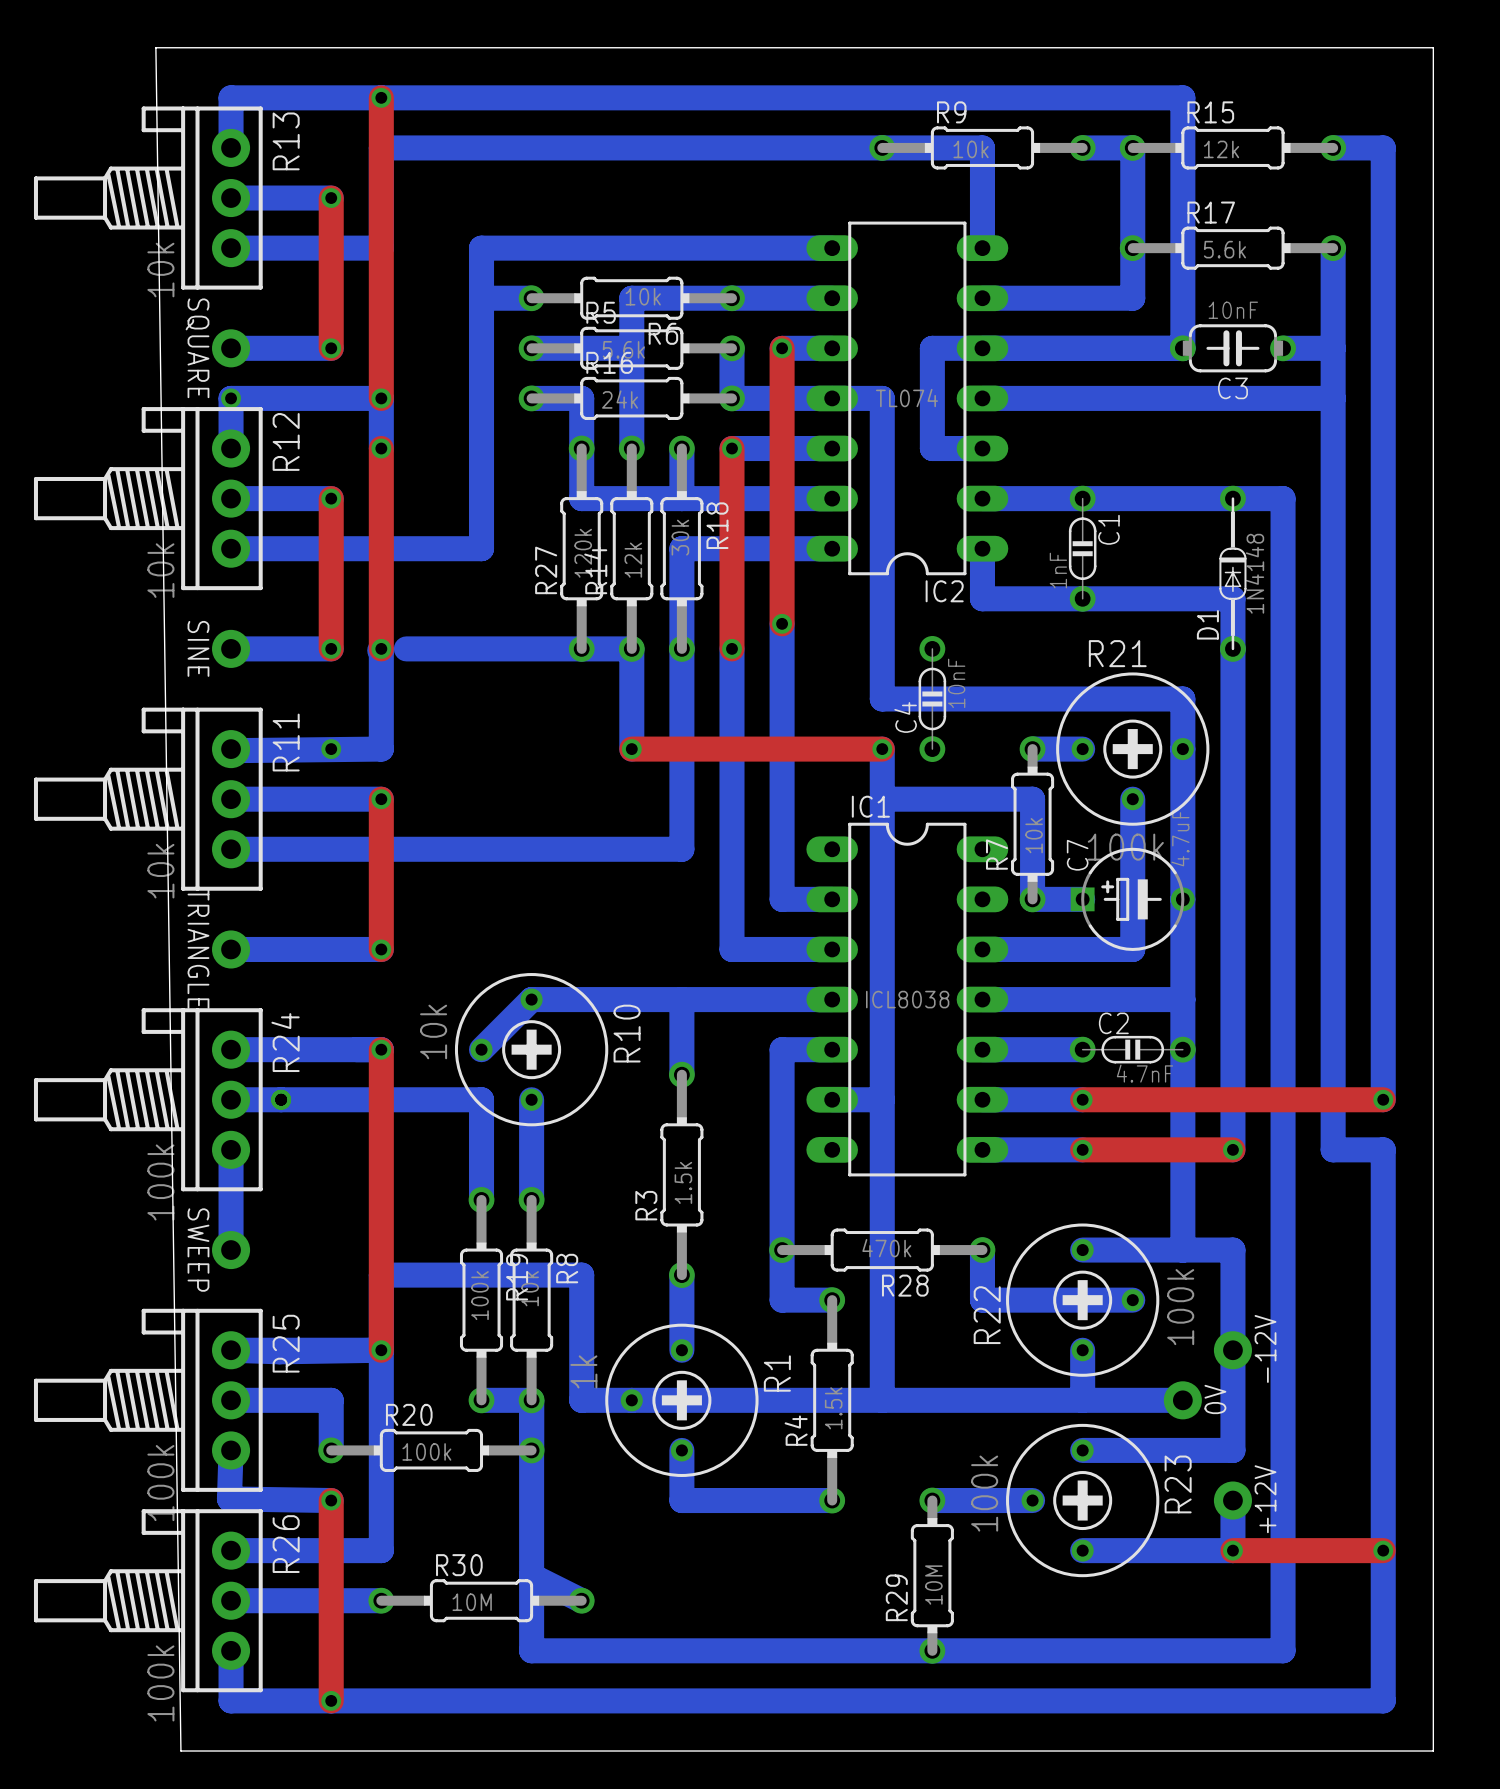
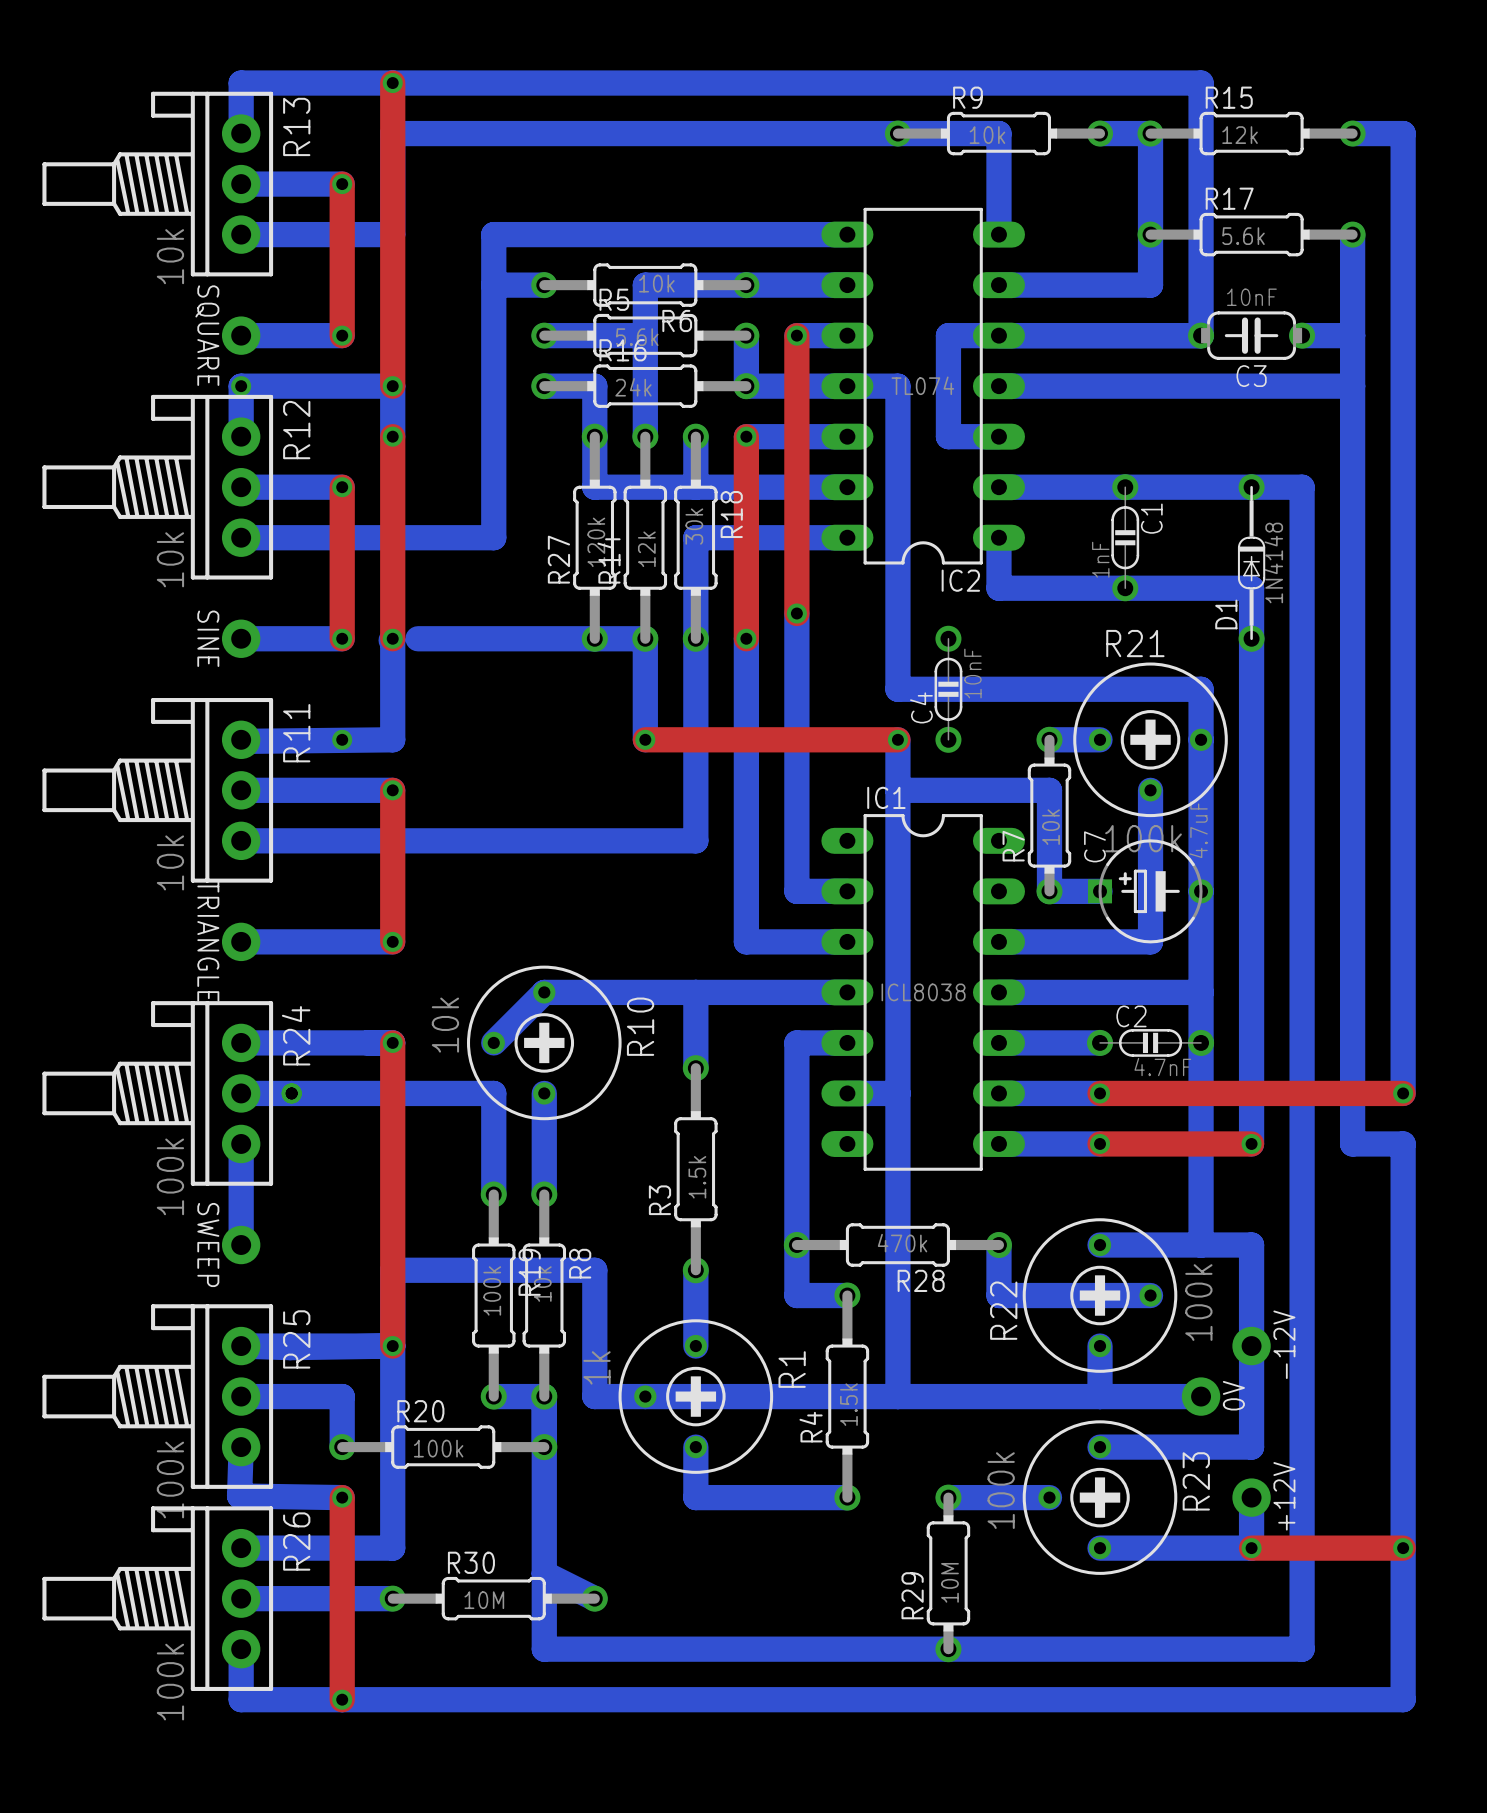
board edge: (155, 47) (1433, 47) (1433, 1751) (180, 1751) (155, 47) -> none
C1 position: (1082, 548) -> (1125, 537)

